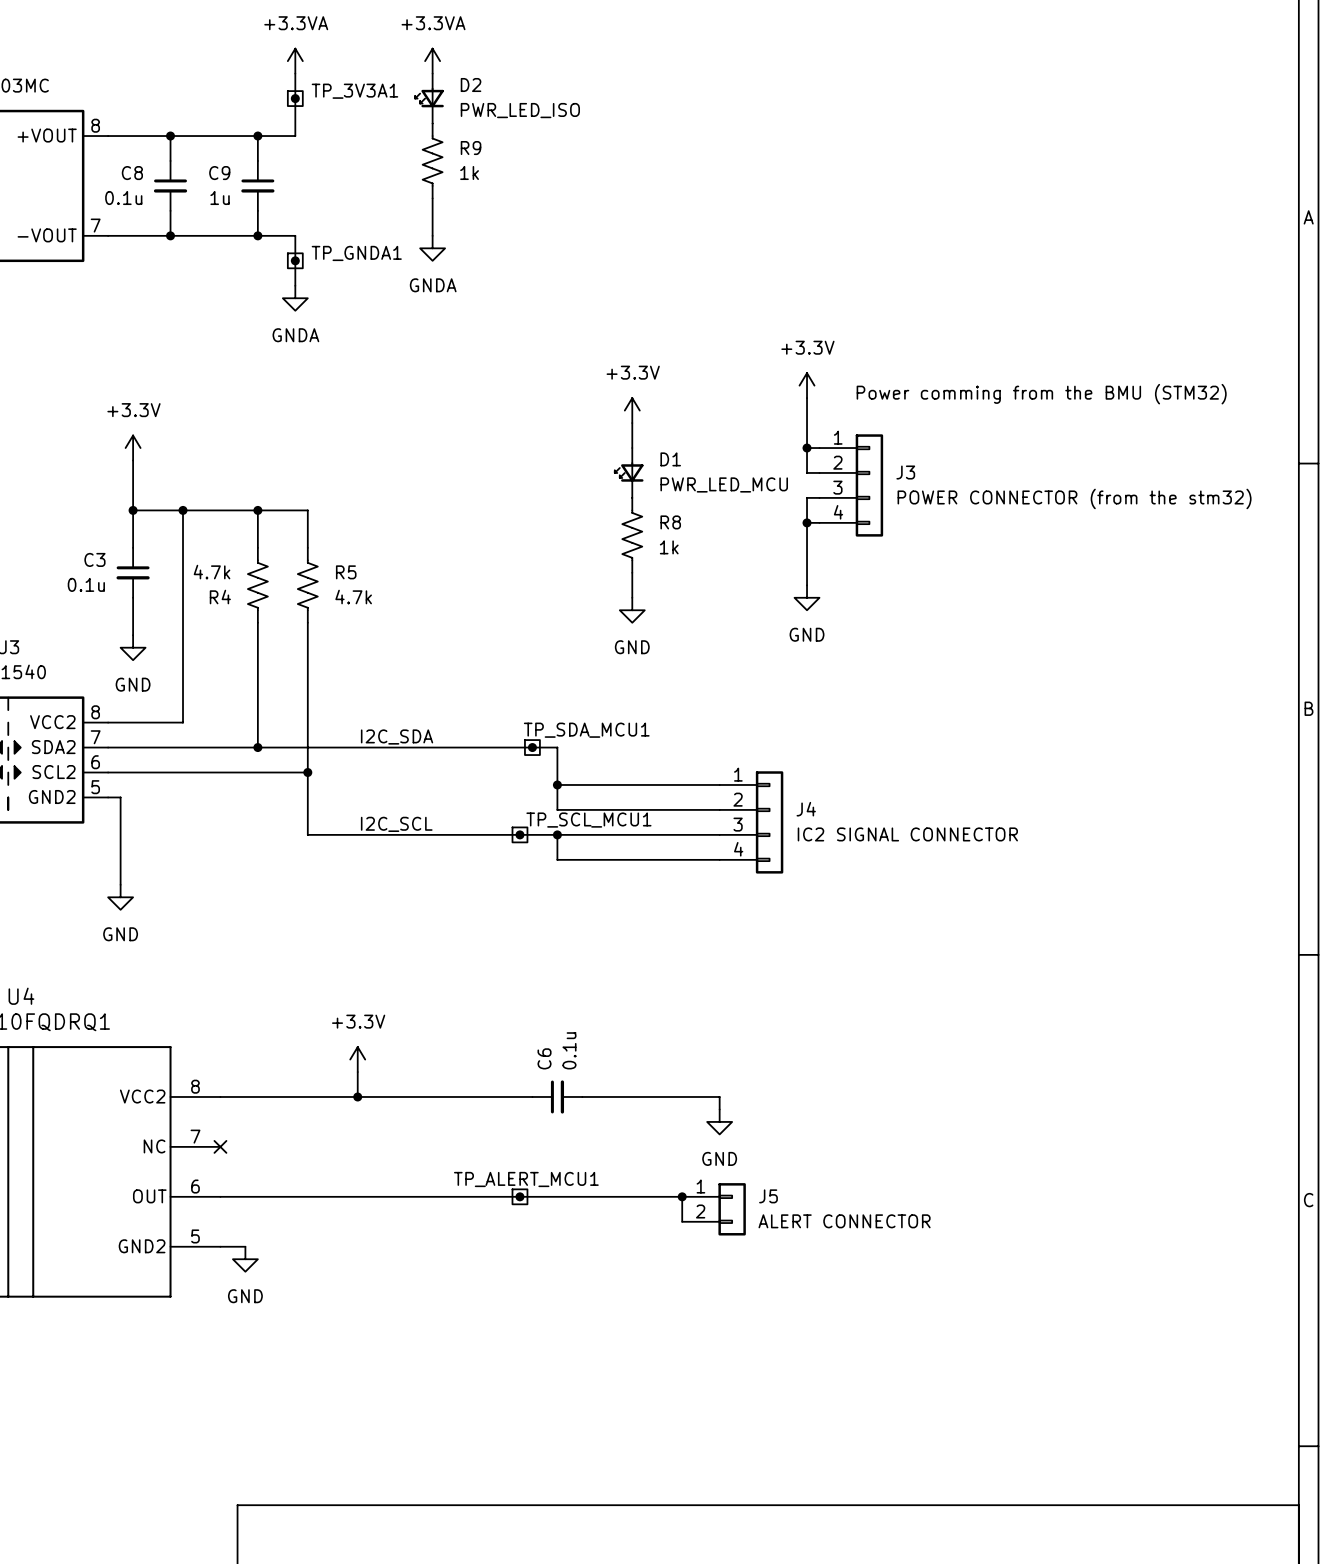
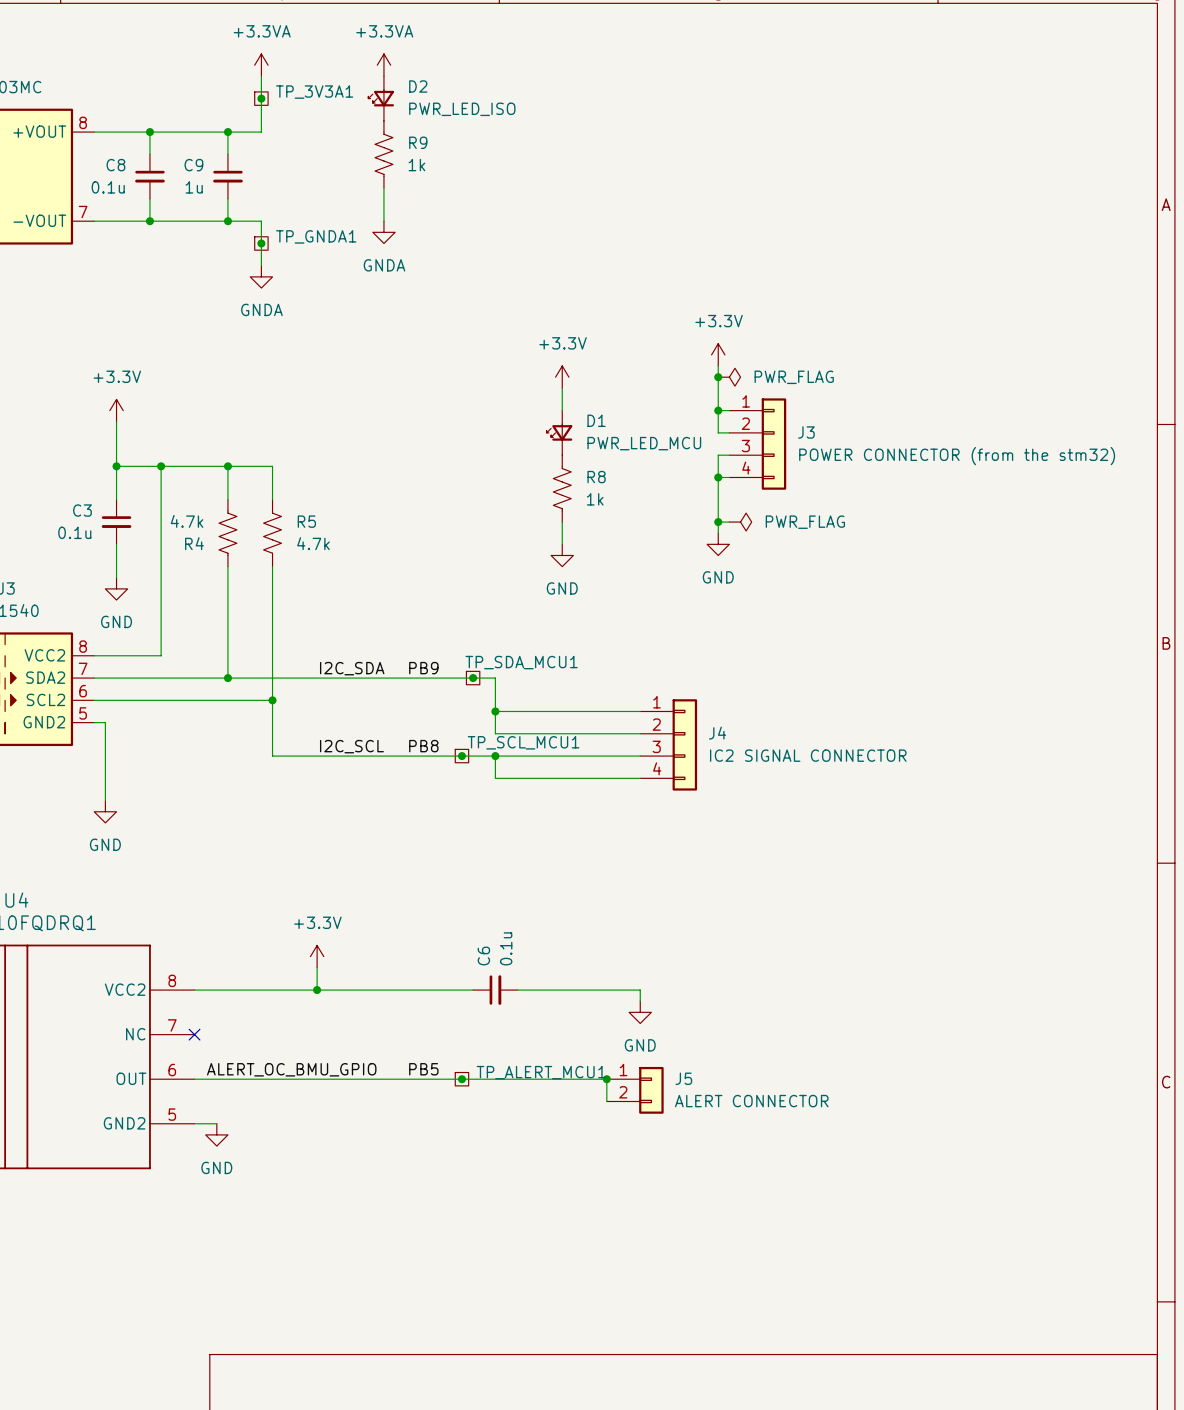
text: Power comming from the BMU (STM32) (1041, 394) -> none
junction: none -> (718, 377)
power symbol: none -> PWR_FLAG (729, 377)
wire: none -> (718, 522) (729, 522)
junction: none -> (718, 522)
power symbol: none -> PWR_FLAG (740, 522)
label: none -> PB9 (423, 668)
label: none -> PB8 (423, 746)
TP_ALERT_MCU1 name position: TP_ALERT_MCU1 (526, 1179) -> TP_ALERT_MCU1 (541, 1072)
label: none -> PB5 (423, 1069)
label: none -> ALERT_OC_BMU_GPIO (291, 1069)

